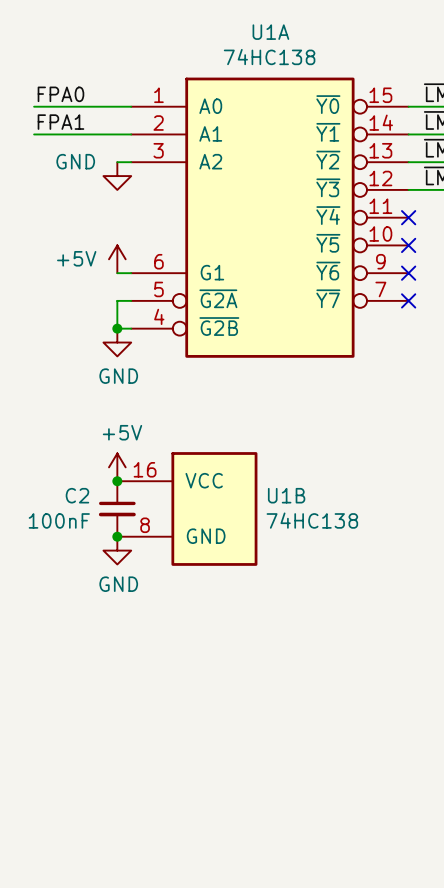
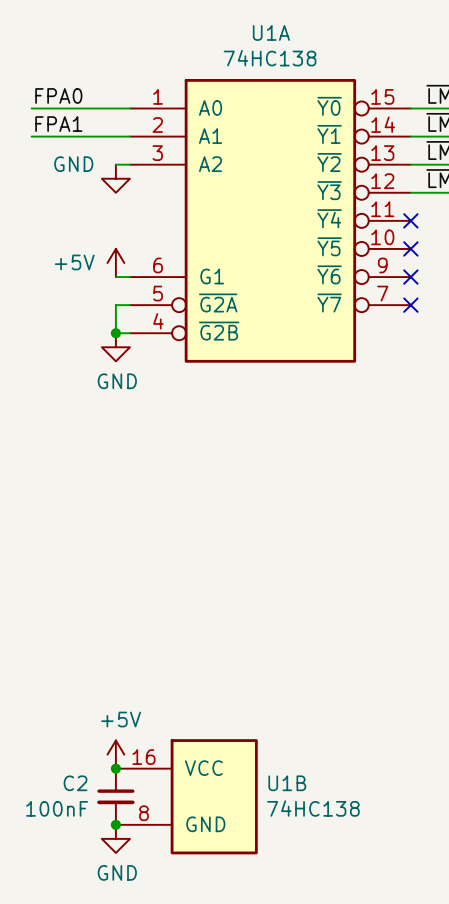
power symbol: +5V (117, 467) -> none
junction: (117, 481) -> none
C2 position: (117, 508) -> (115, 796)
U1B position: (187, 508) -> (186, 796)
junction: (117, 536) -> none
power symbol: GND (117, 550) -> none
power symbol: none -> +5V (115, 754)
junction: none -> (115, 768)
junction: none -> (115, 824)
power symbol: none -> GND (115, 838)

